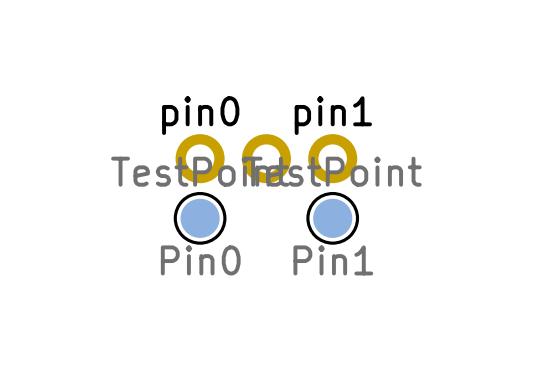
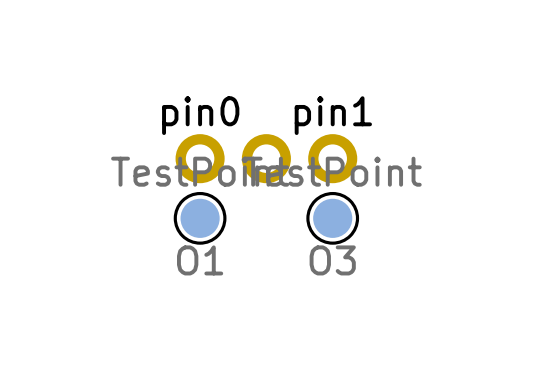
Pin0 name: Pin0 (200, 260) -> O1 (200, 260)
Pin1 name: Pin1 (333, 260) -> O3 (332, 260)

